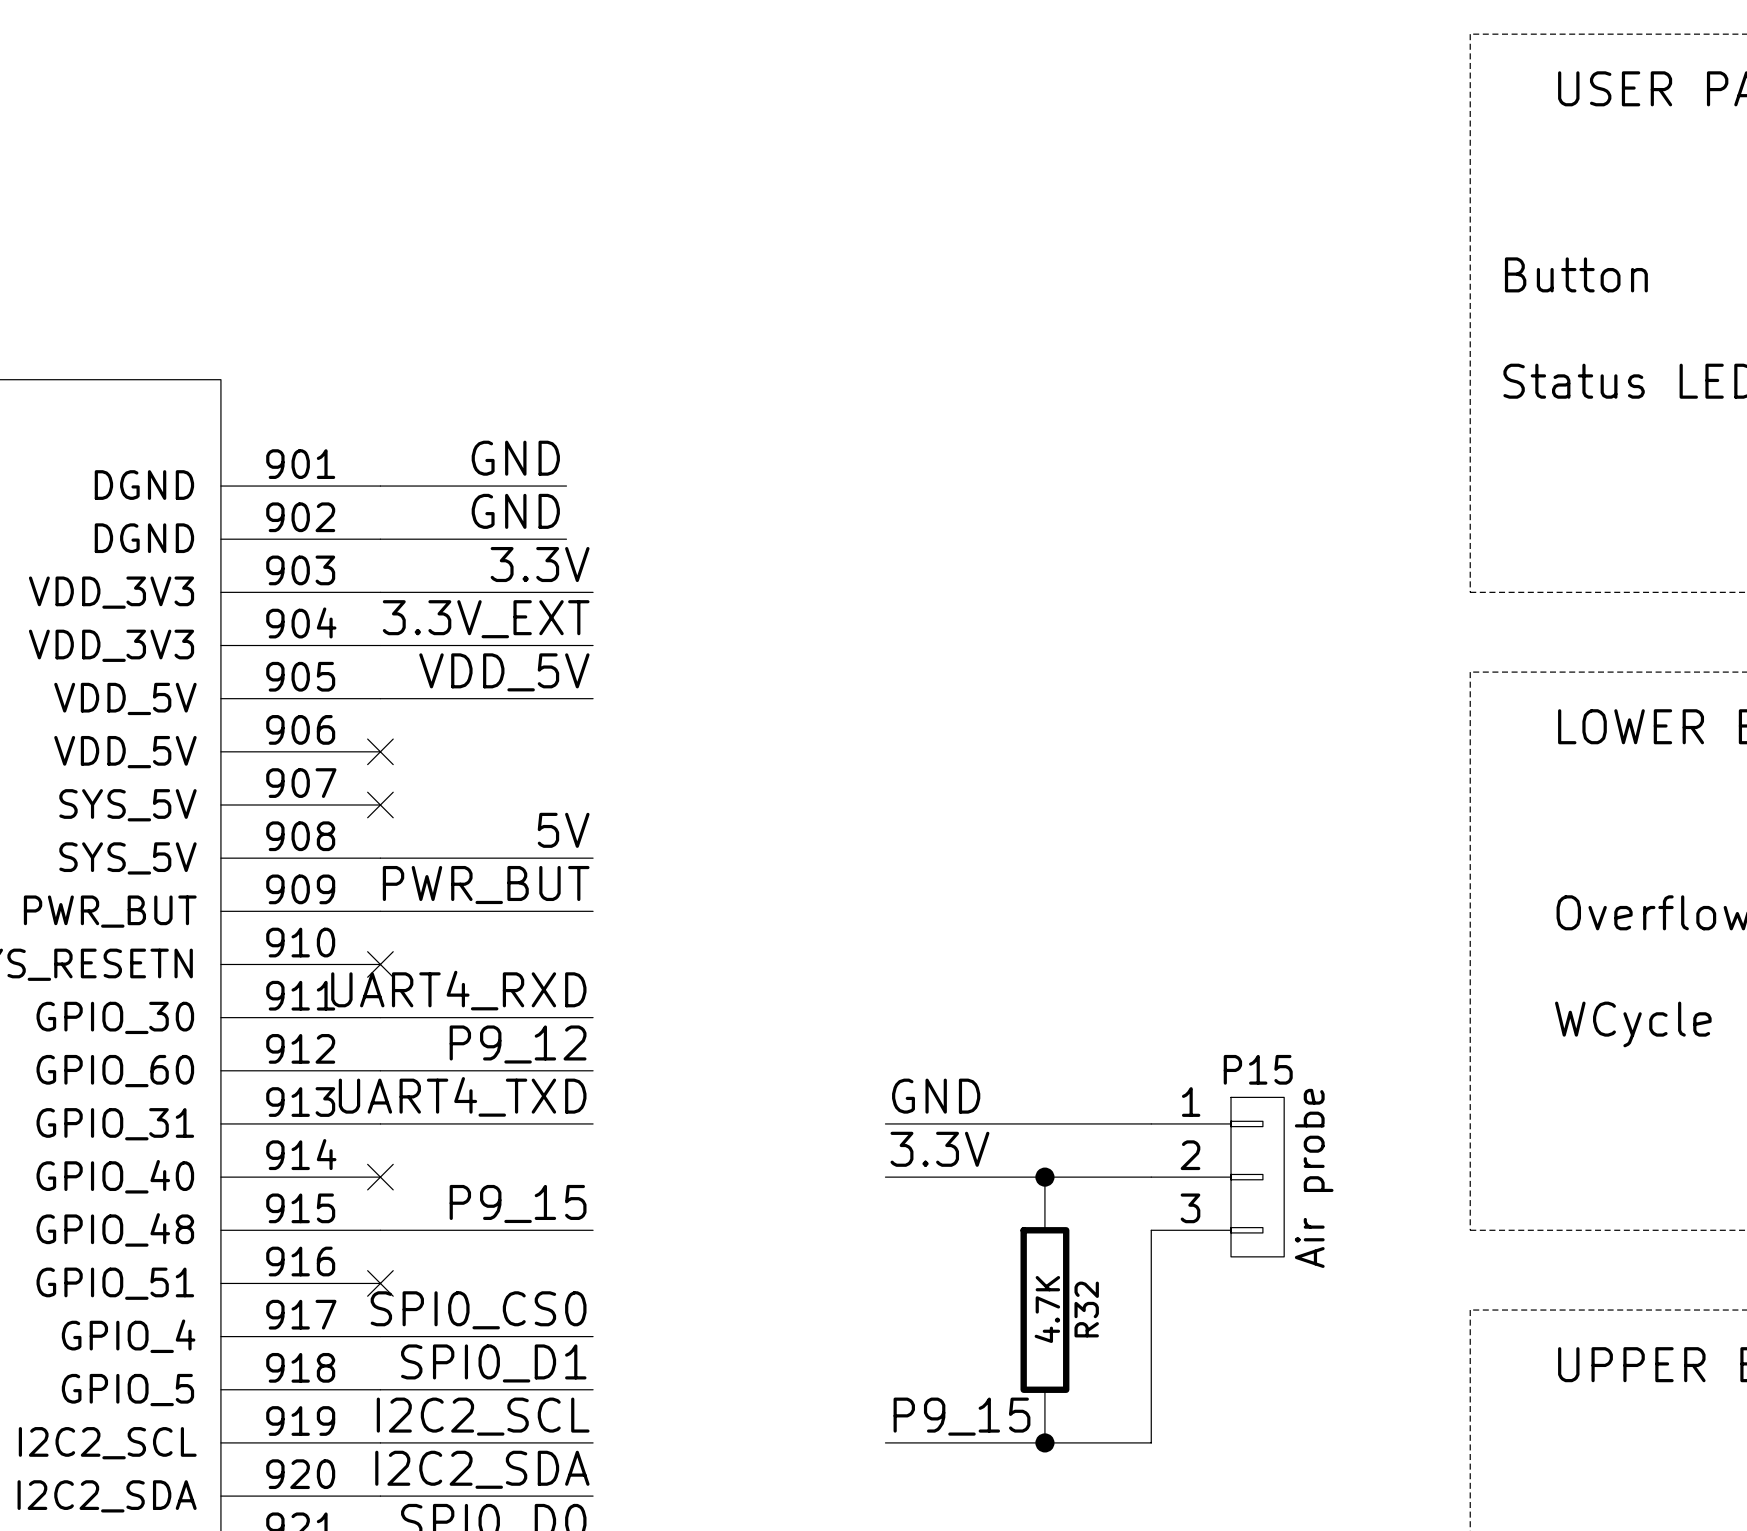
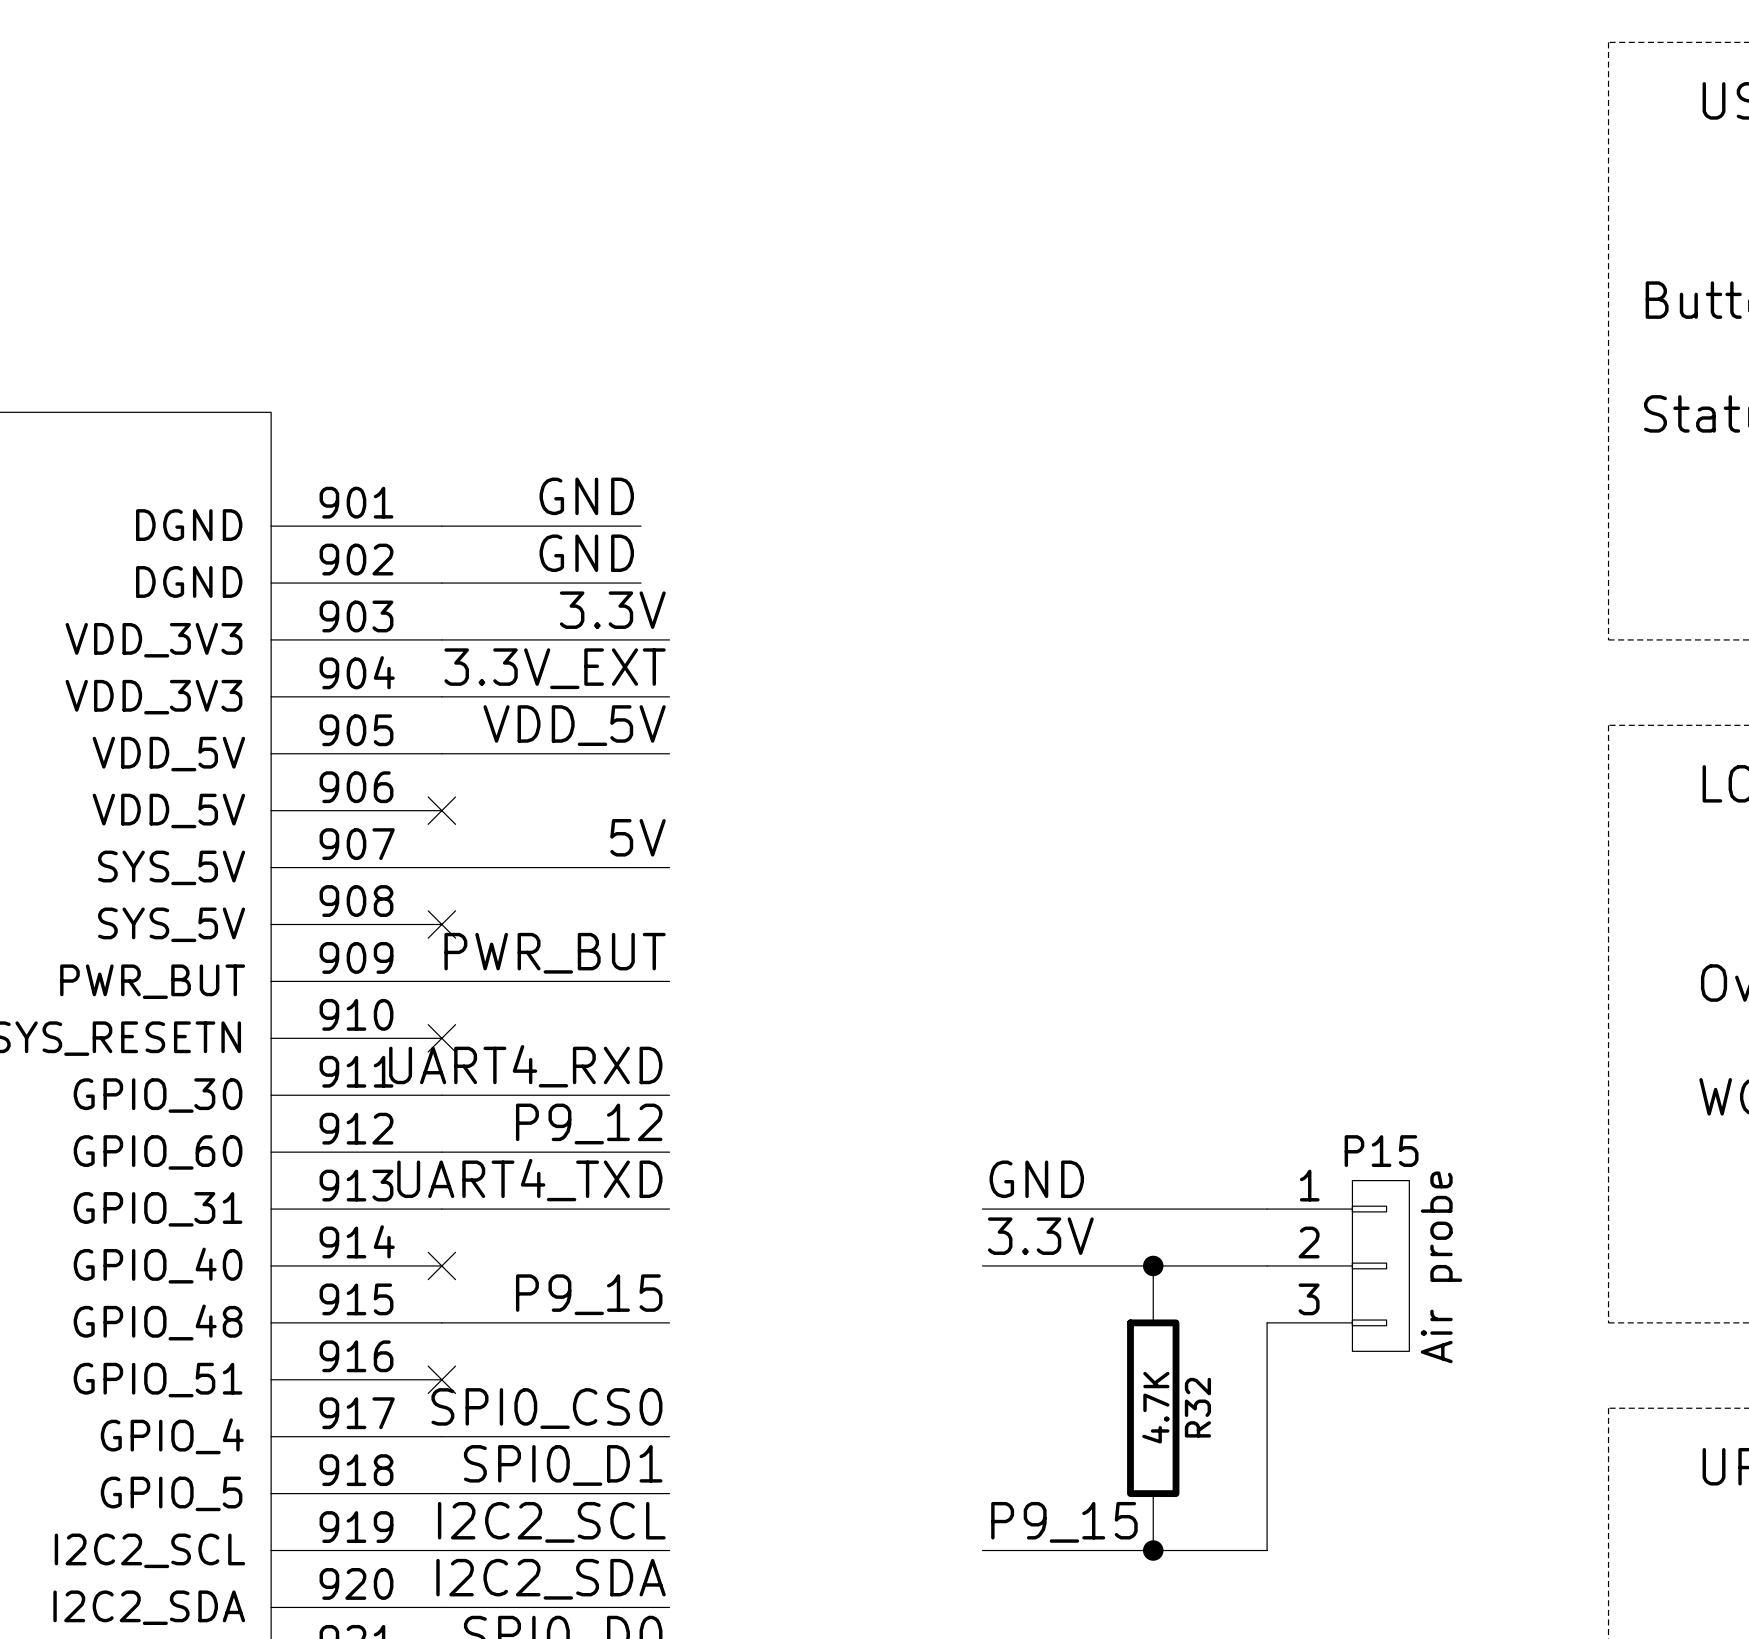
no-connect mark position: (380, 804) -> (441, 924)
label position: 5V (563, 830) -> 5V (637, 837)
wire: (380, 858) (593, 858) -> (441, 867) (669, 867)

